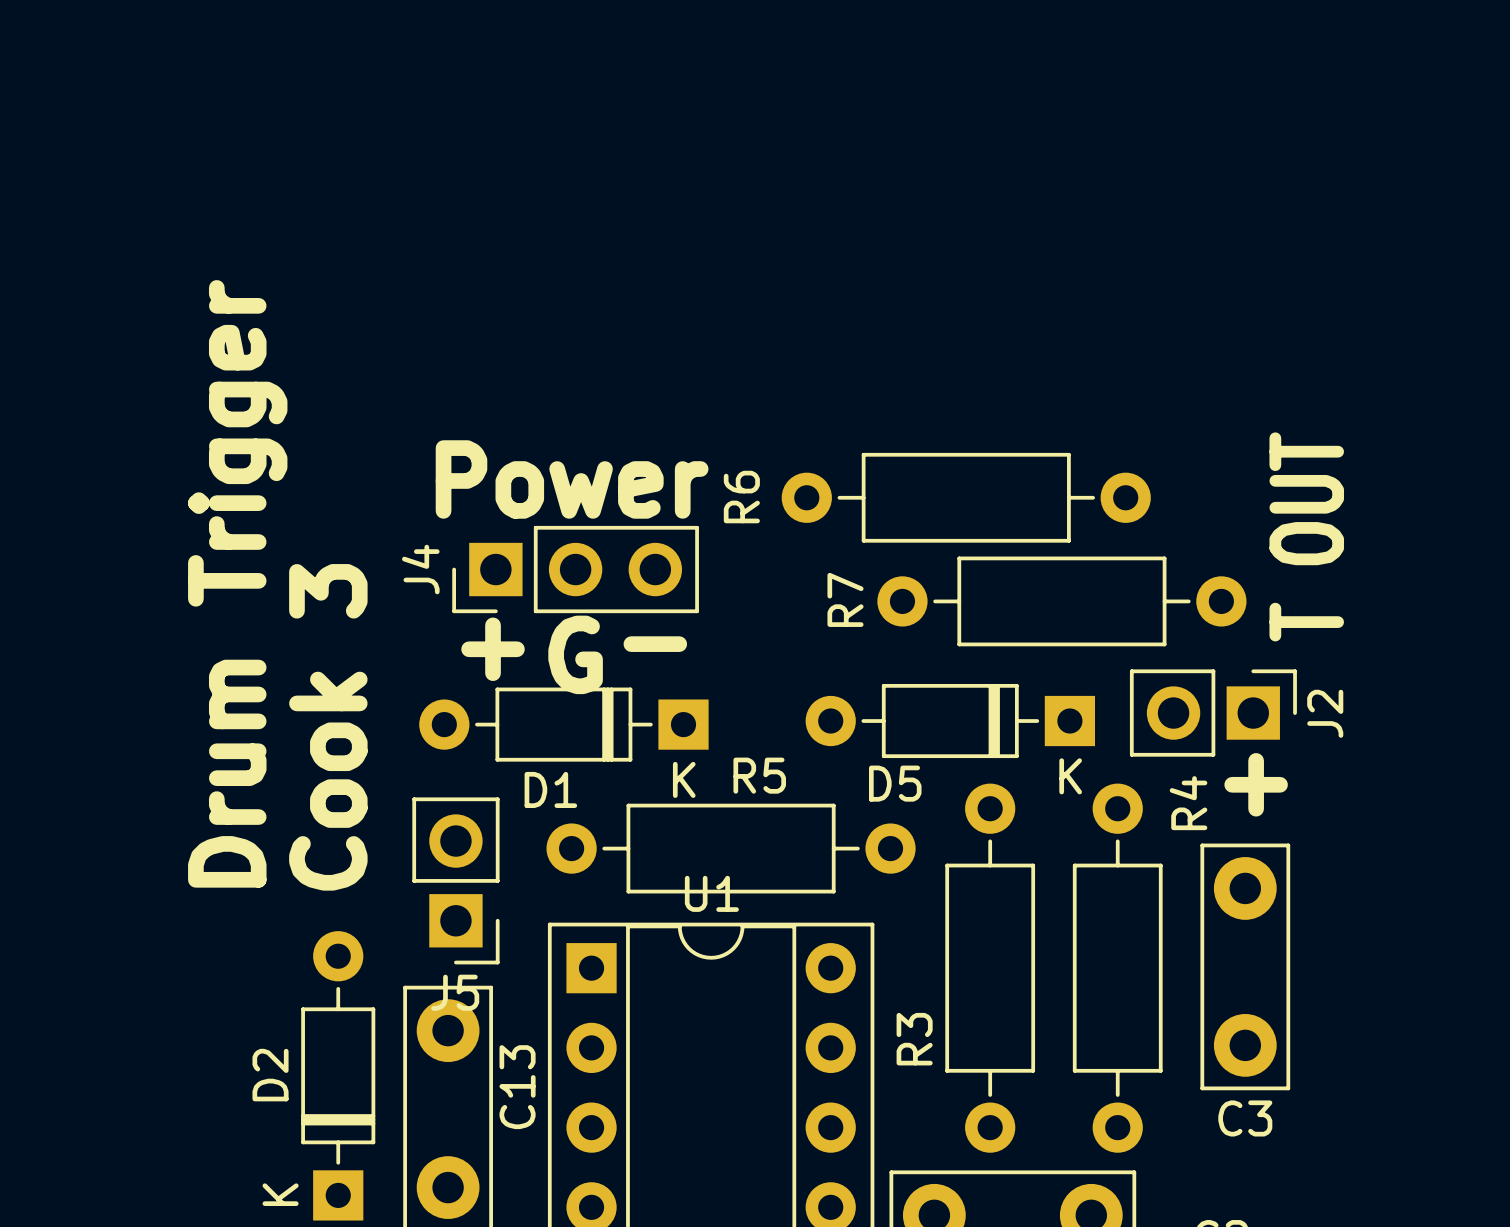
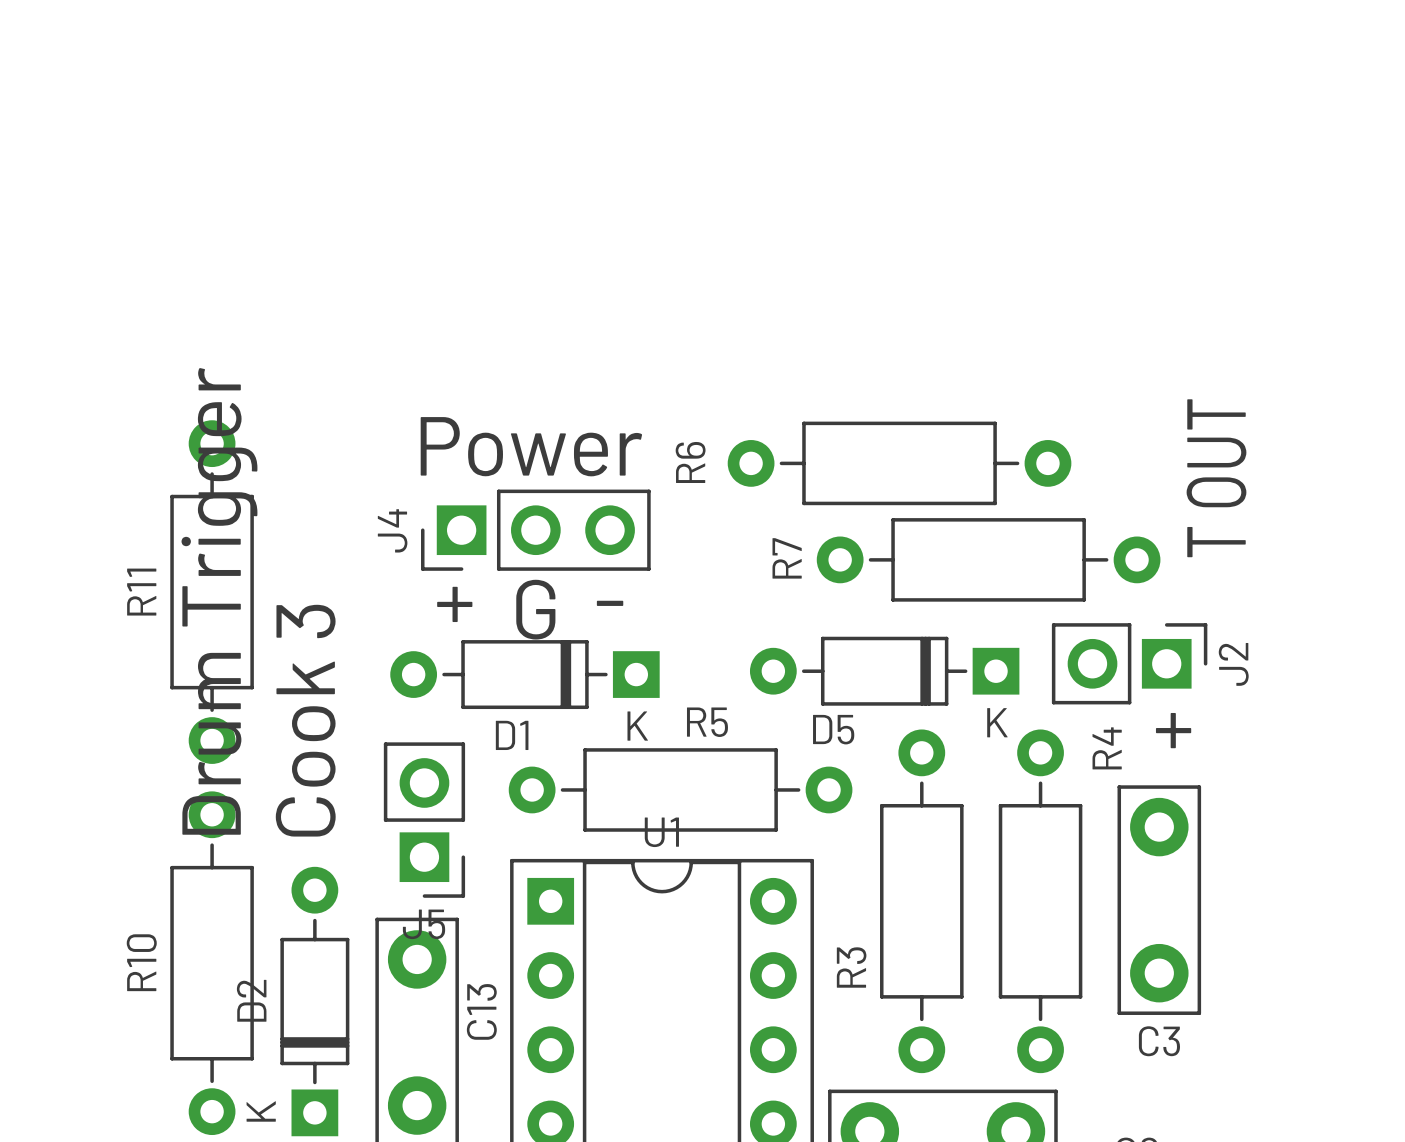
R11: none -> (212, 592)
R10: none -> (212, 963)

